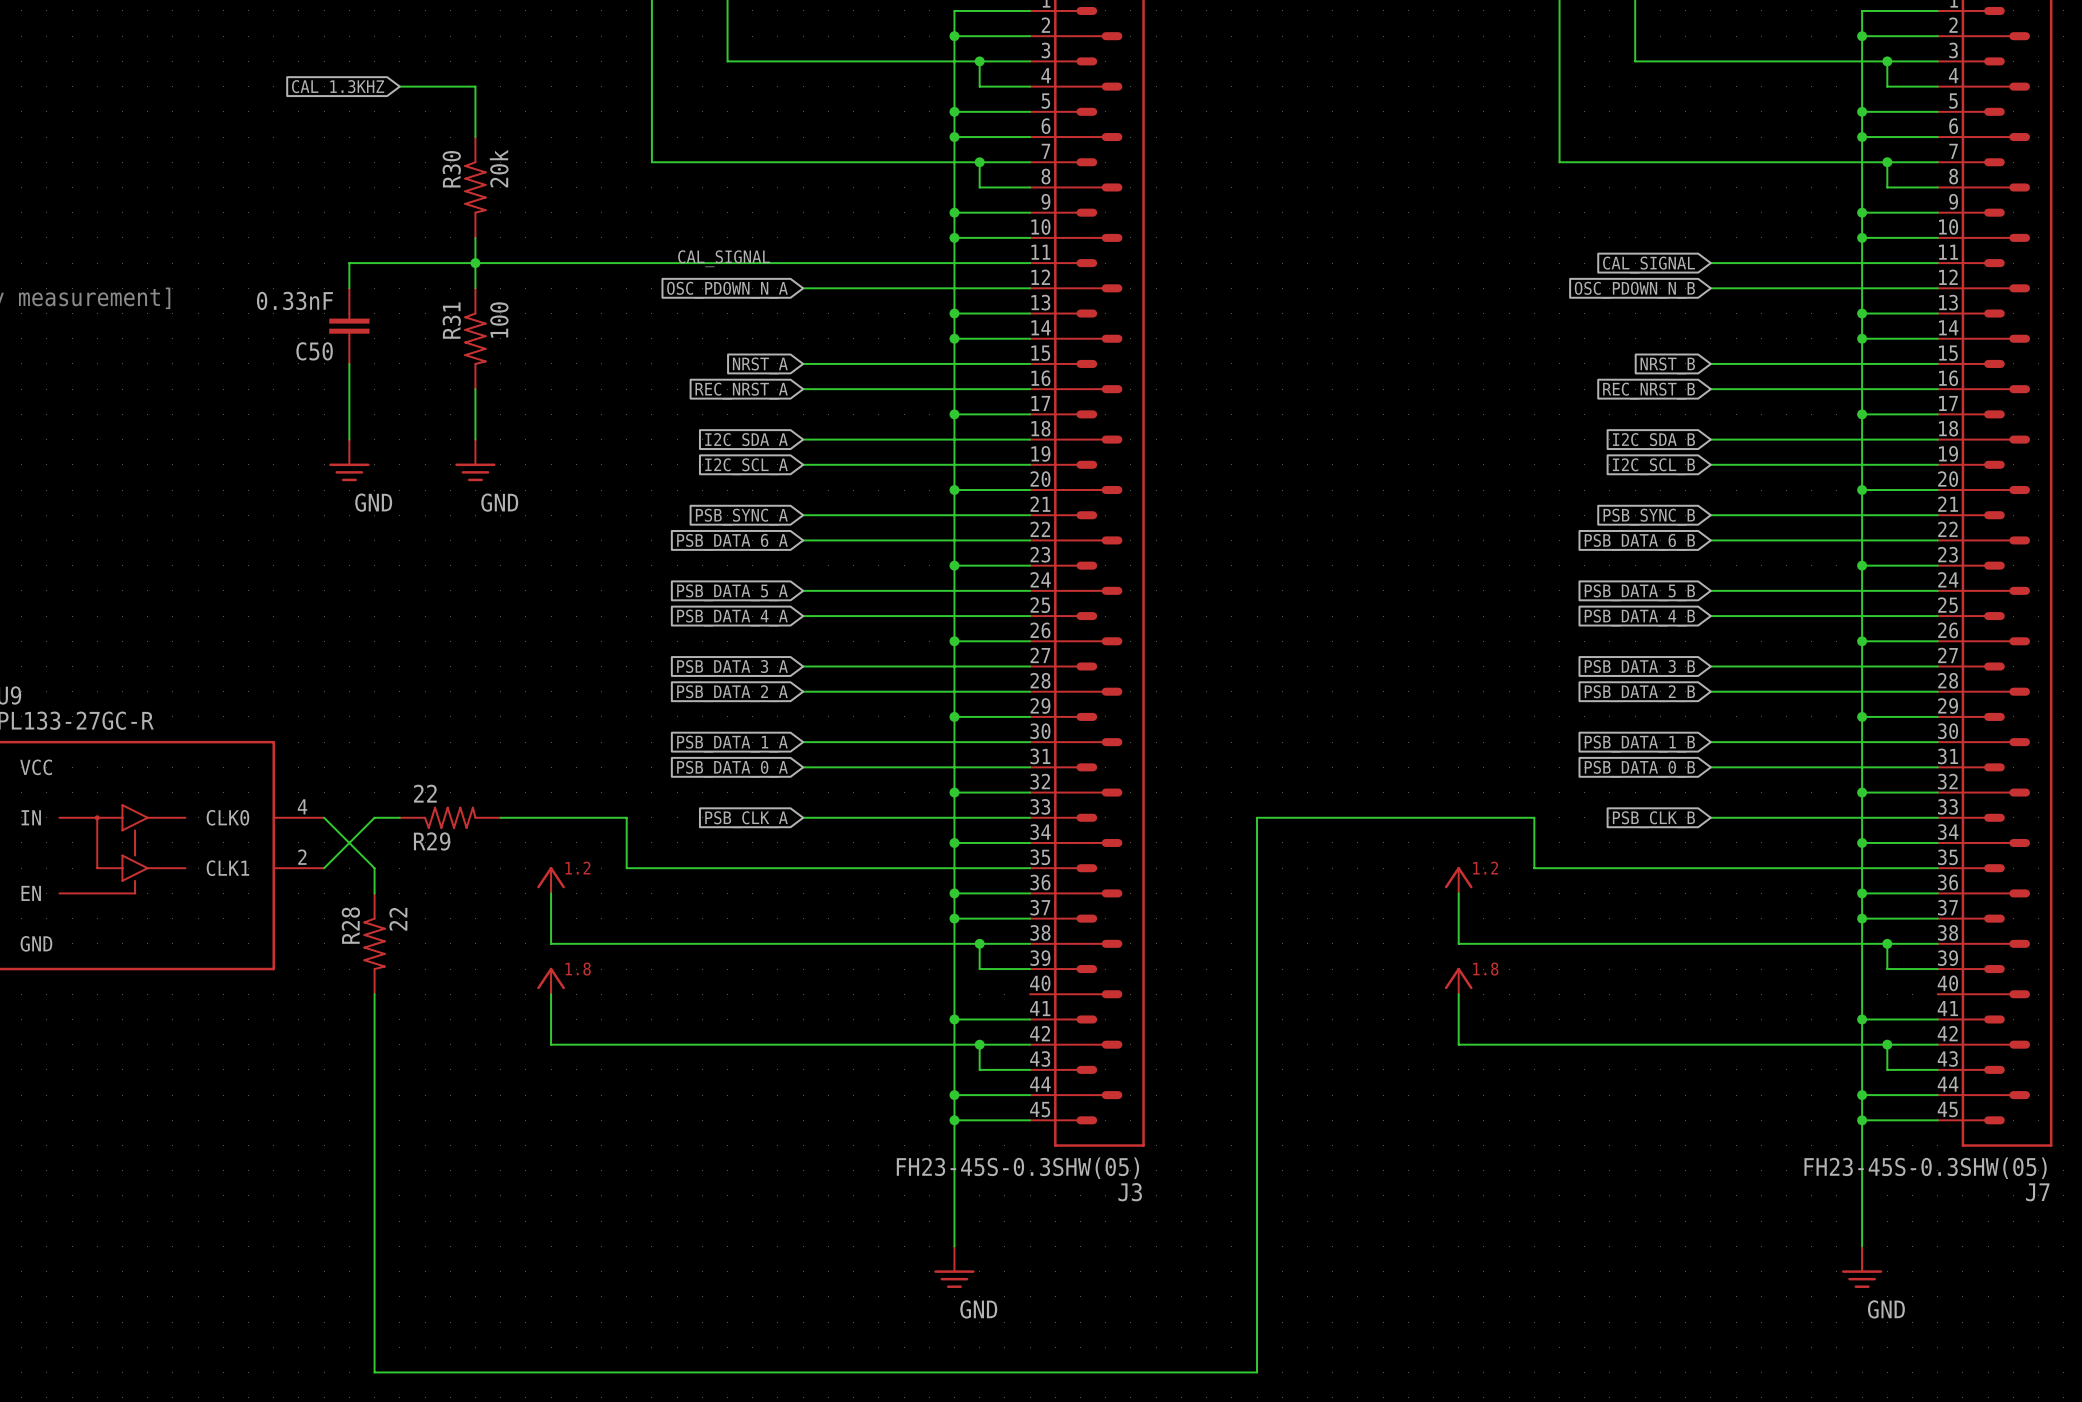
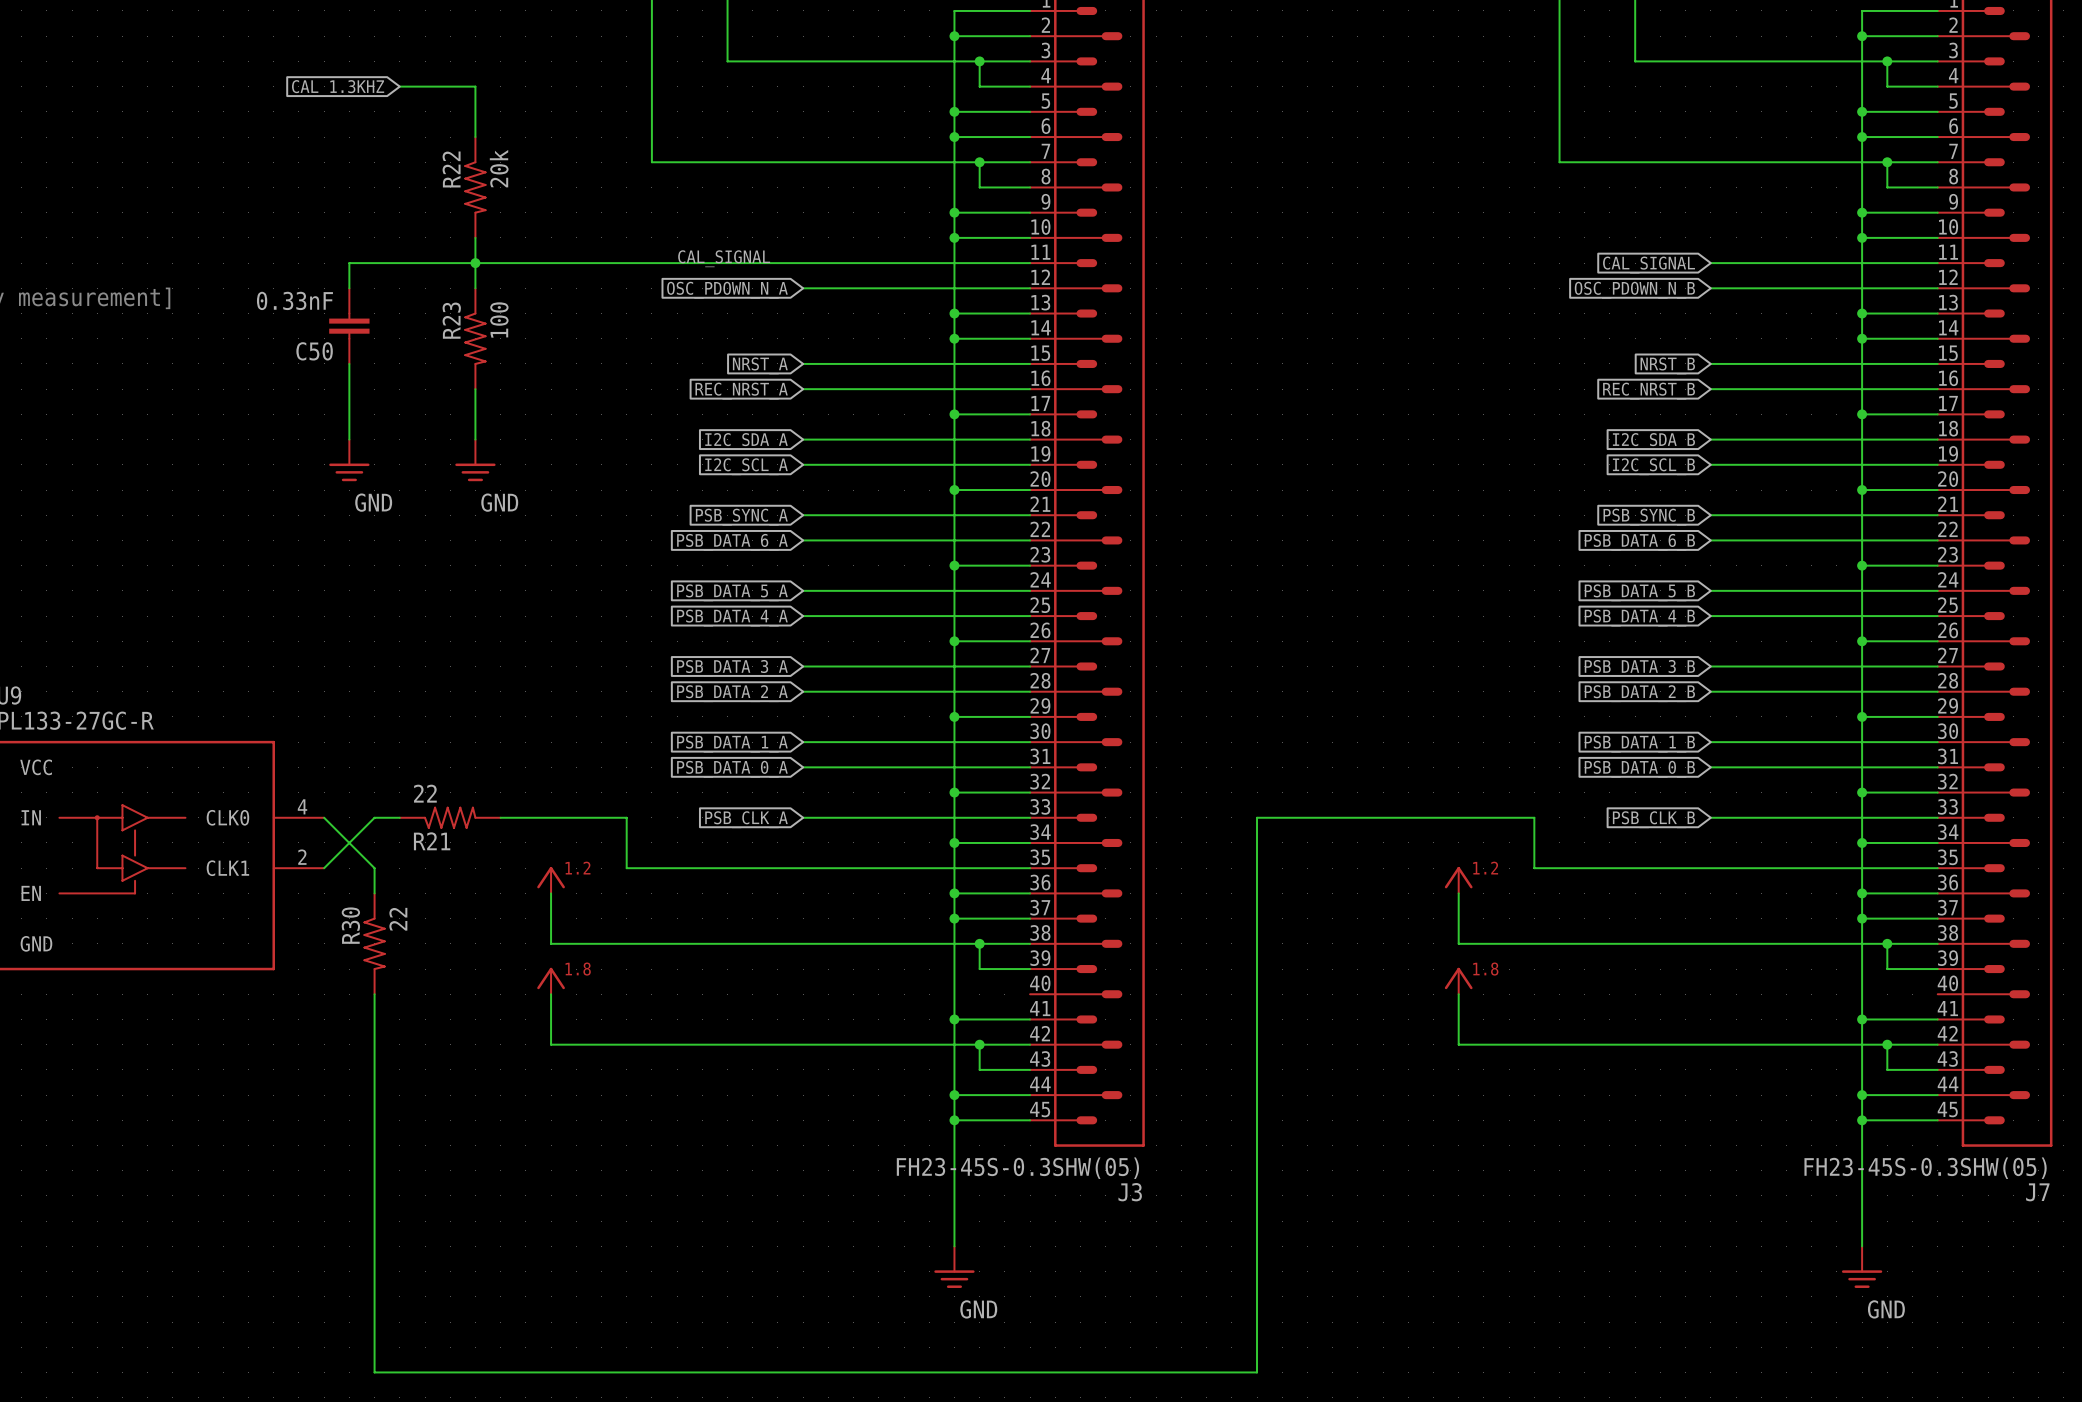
R30 name: R30 (451, 169) -> R22 (451, 169)
R31 name: R31 (451, 320) -> R23 (451, 320)
R29 name: R29 (432, 841) -> R21 (432, 841)
R28 name: R28 (350, 925) -> R30 (350, 925)

